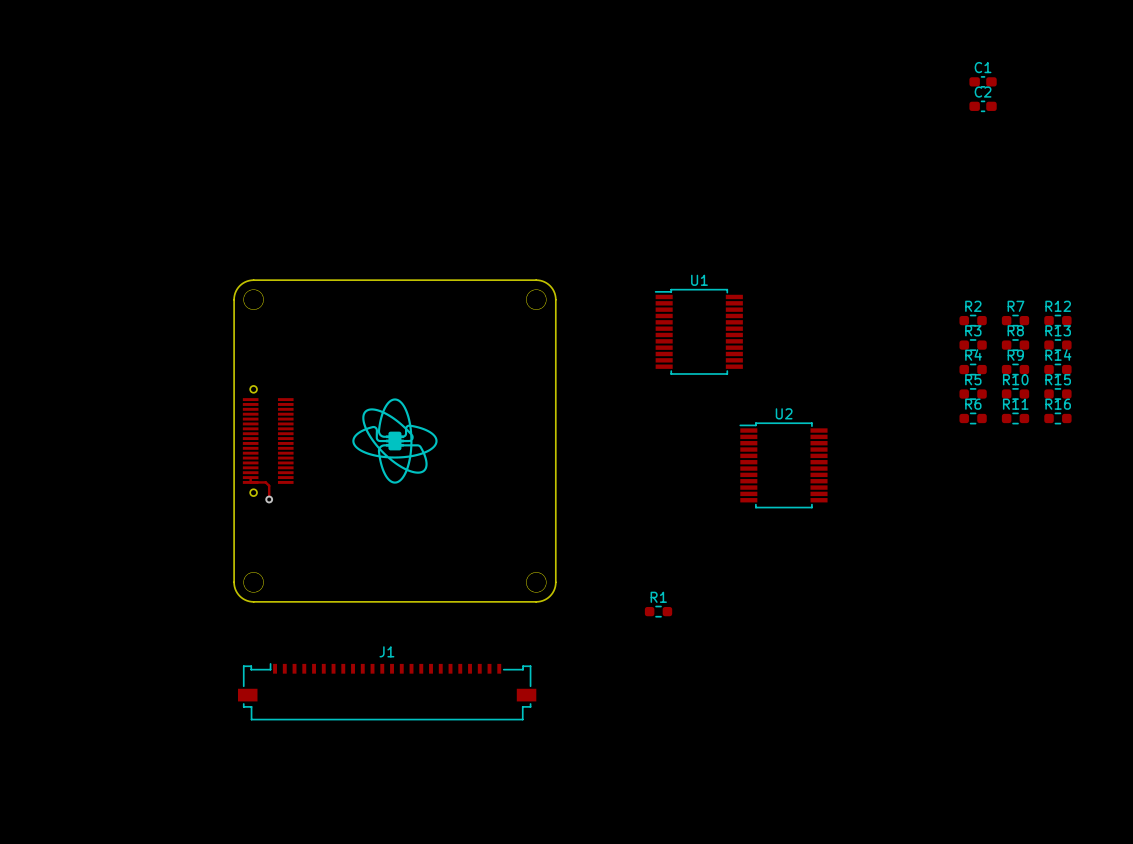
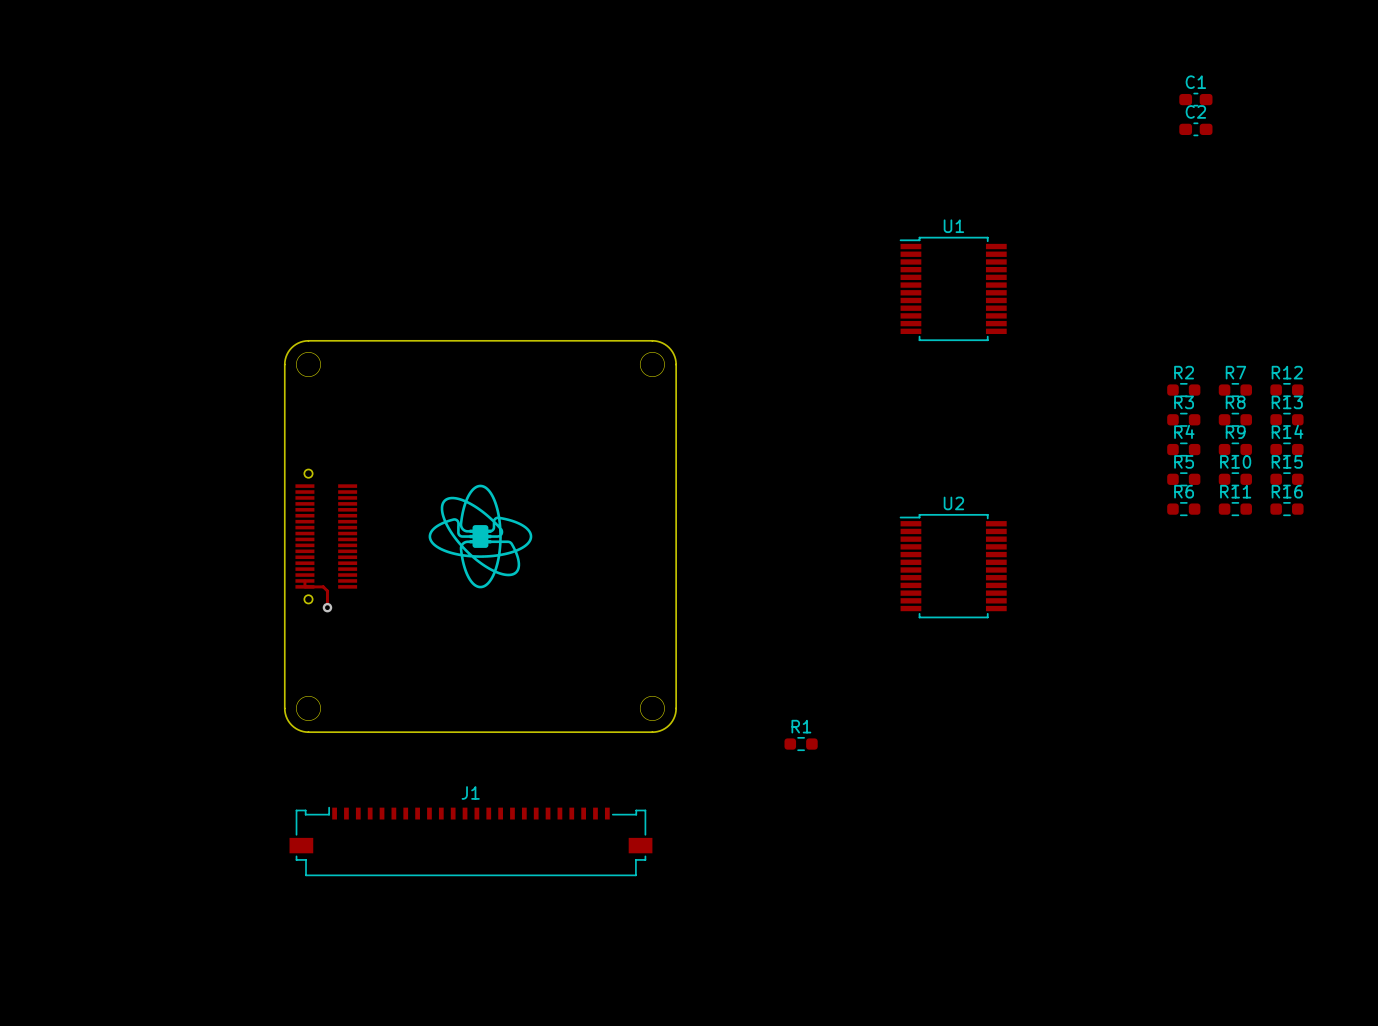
U1 position: (698, 331) -> (953, 288)

